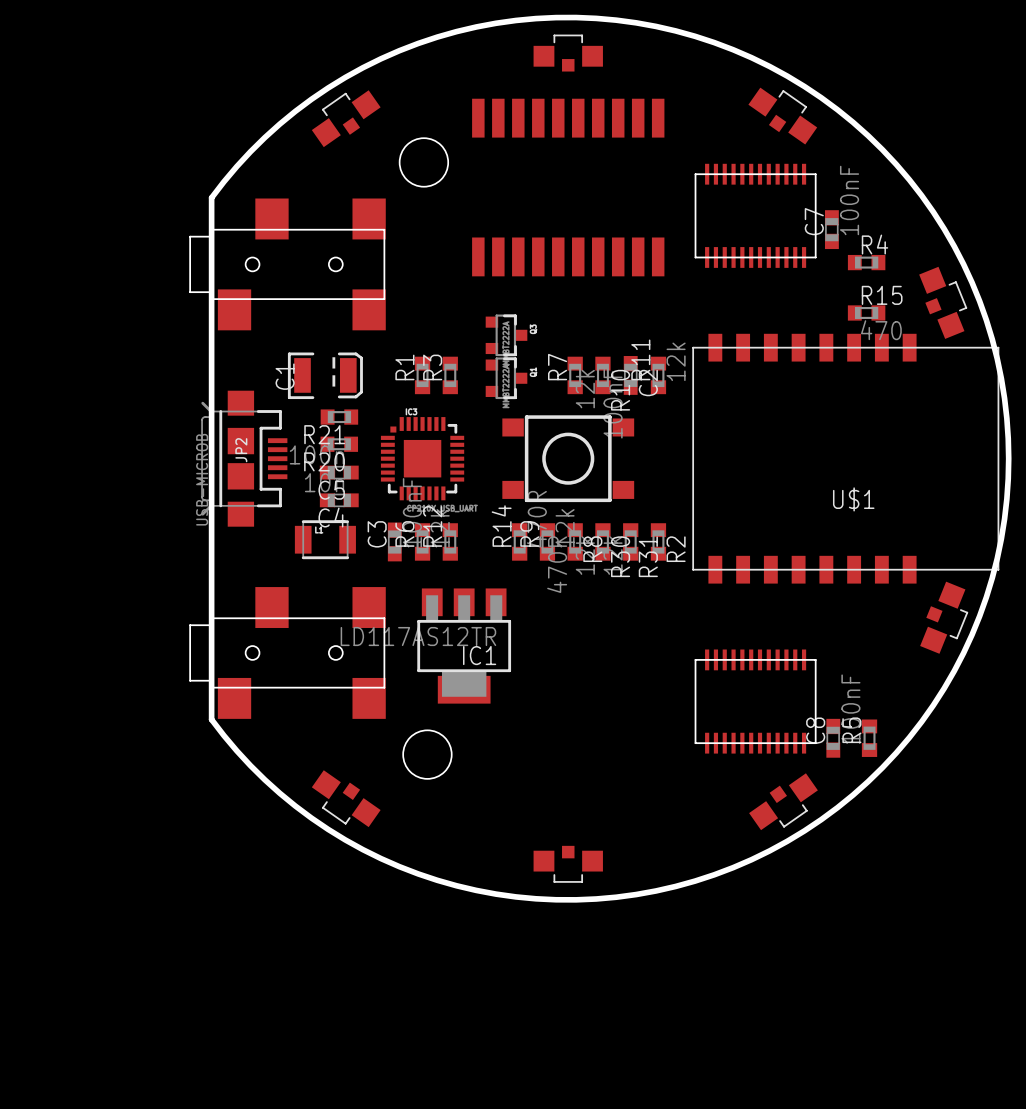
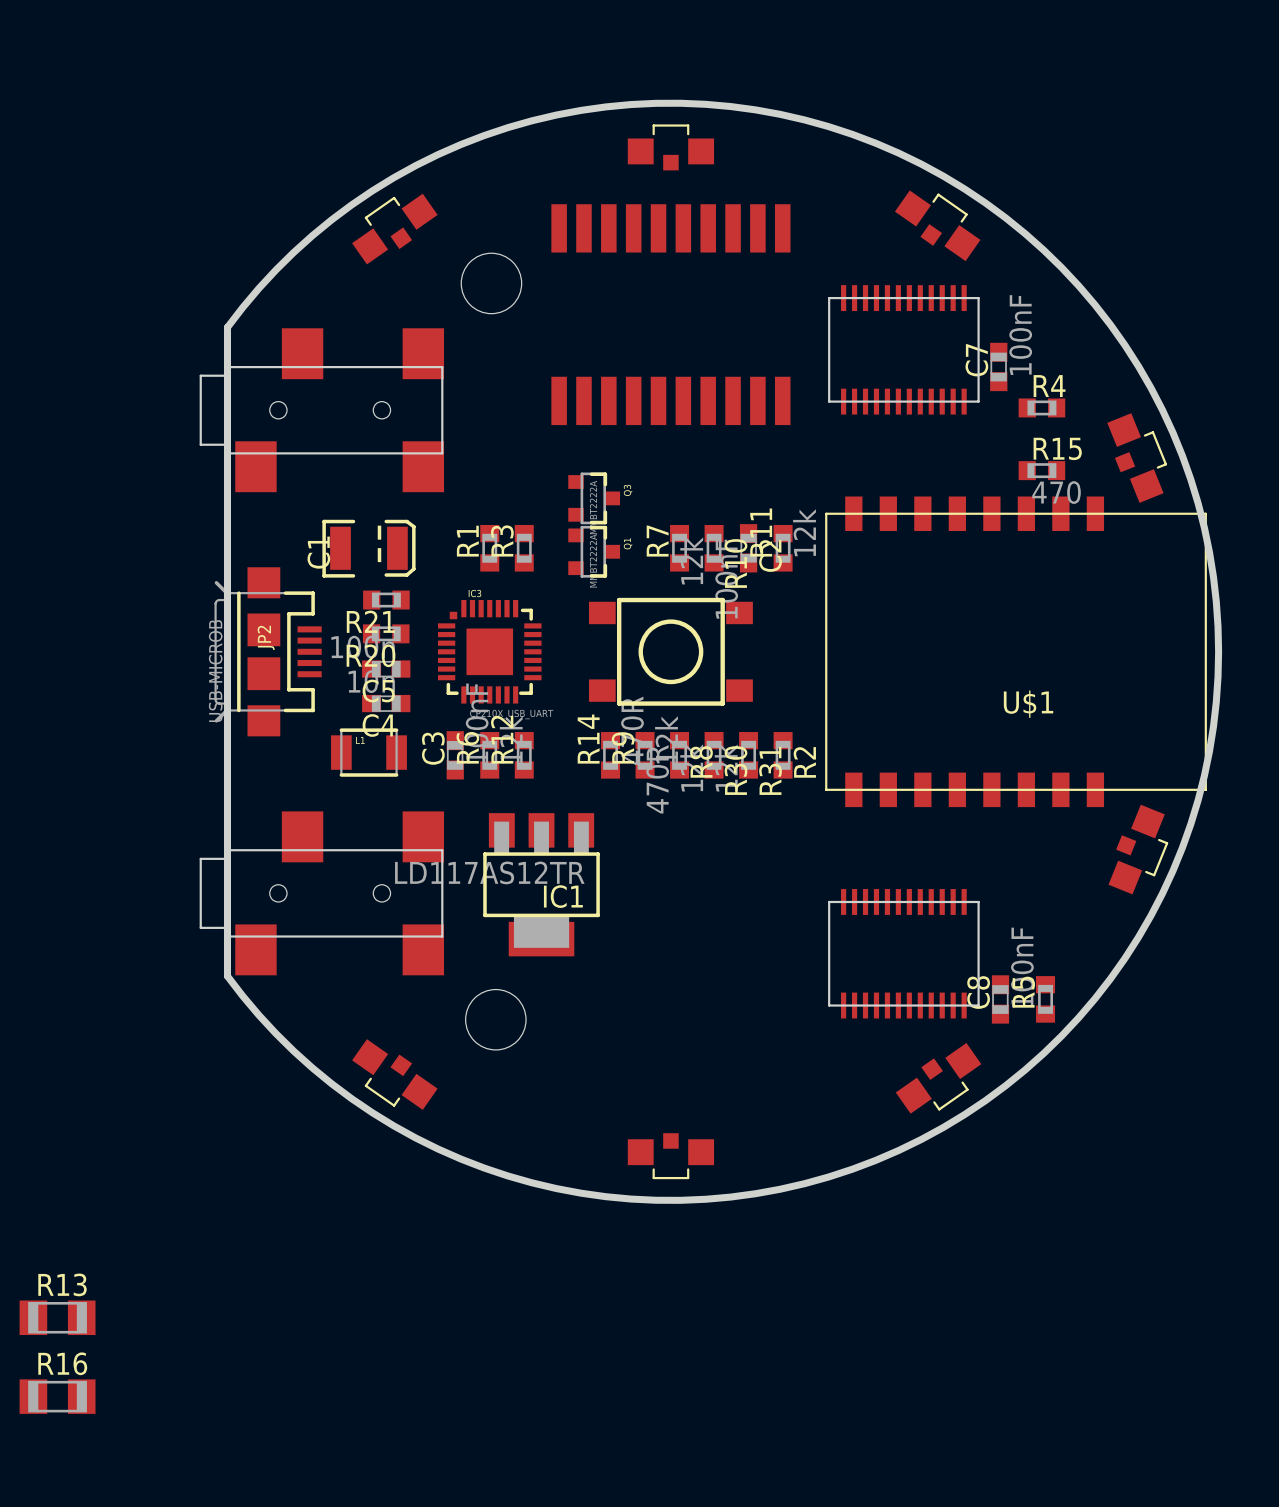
R13: none -> (57, 1317)
R16: none -> (57, 1396)

